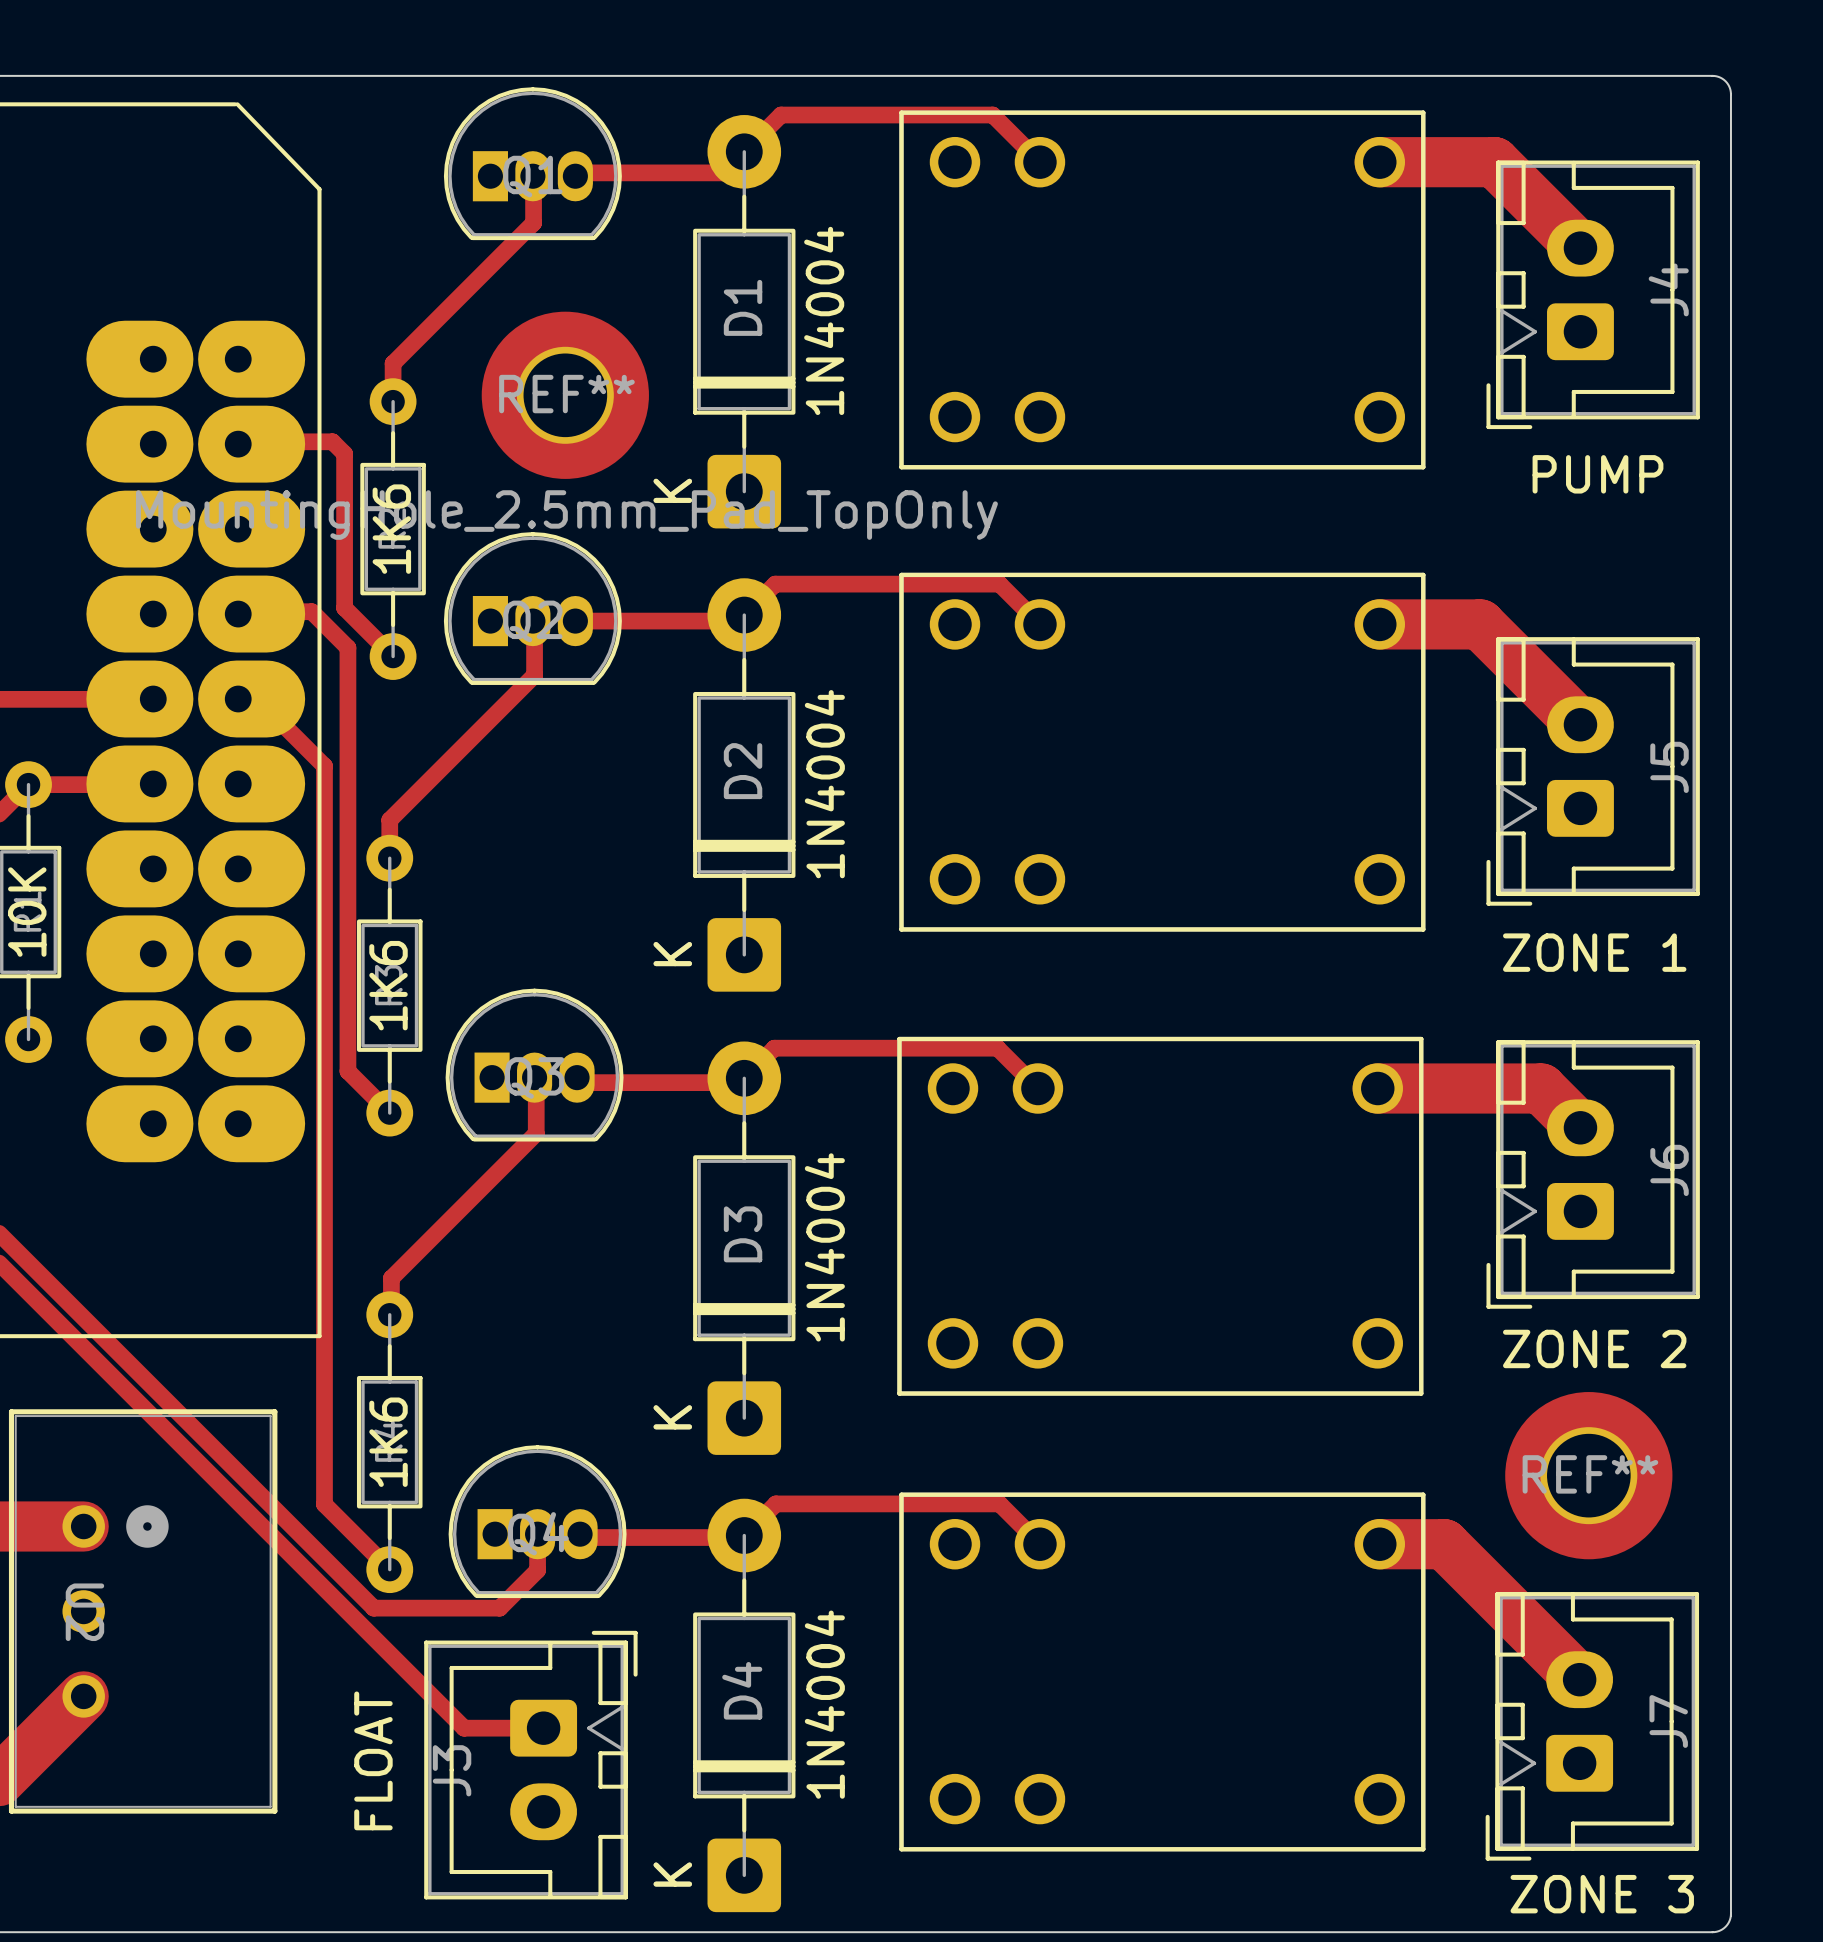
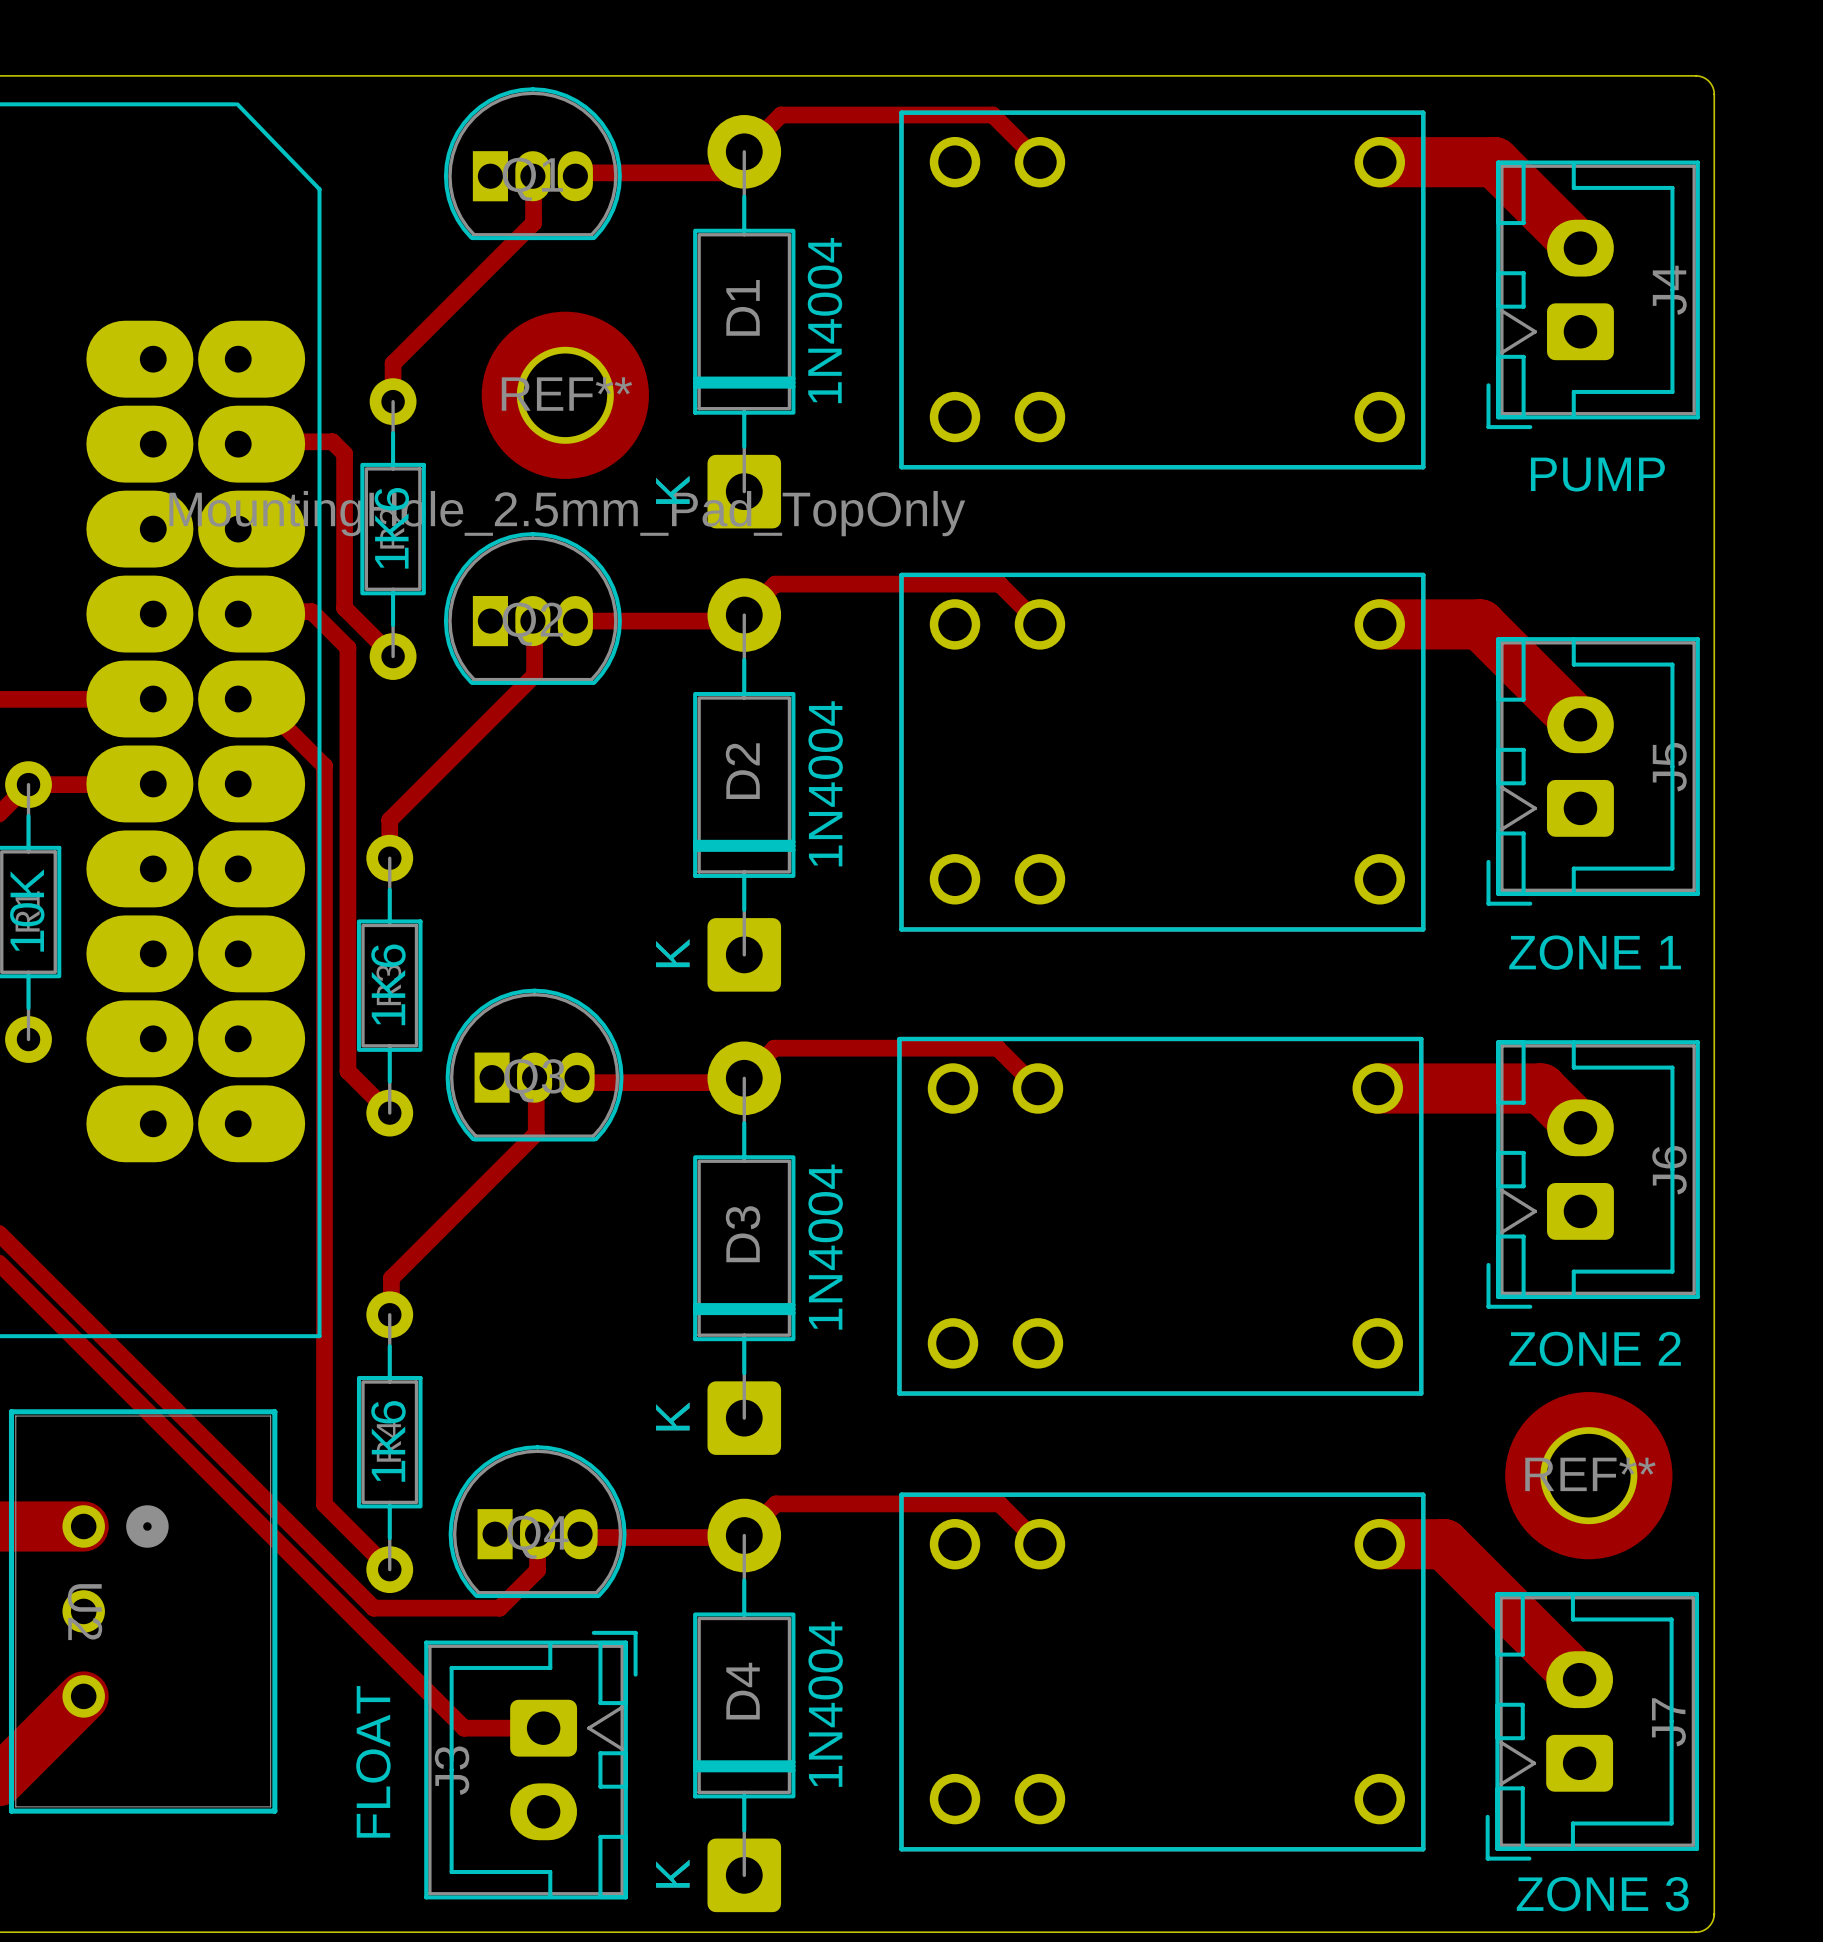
board edge: (1695, 75) (1720, 77) (1728, 84) (1730, 94) (1730, 1915) -> (1695, 75) (1708, 81) (1714, 94) (1714, 1915)
board edge: (1730, 1913) (1728, 1923) (1720, 1930) (1695, 1932) -> (1714, 1913) (1708, 1926) (1695, 1932)

